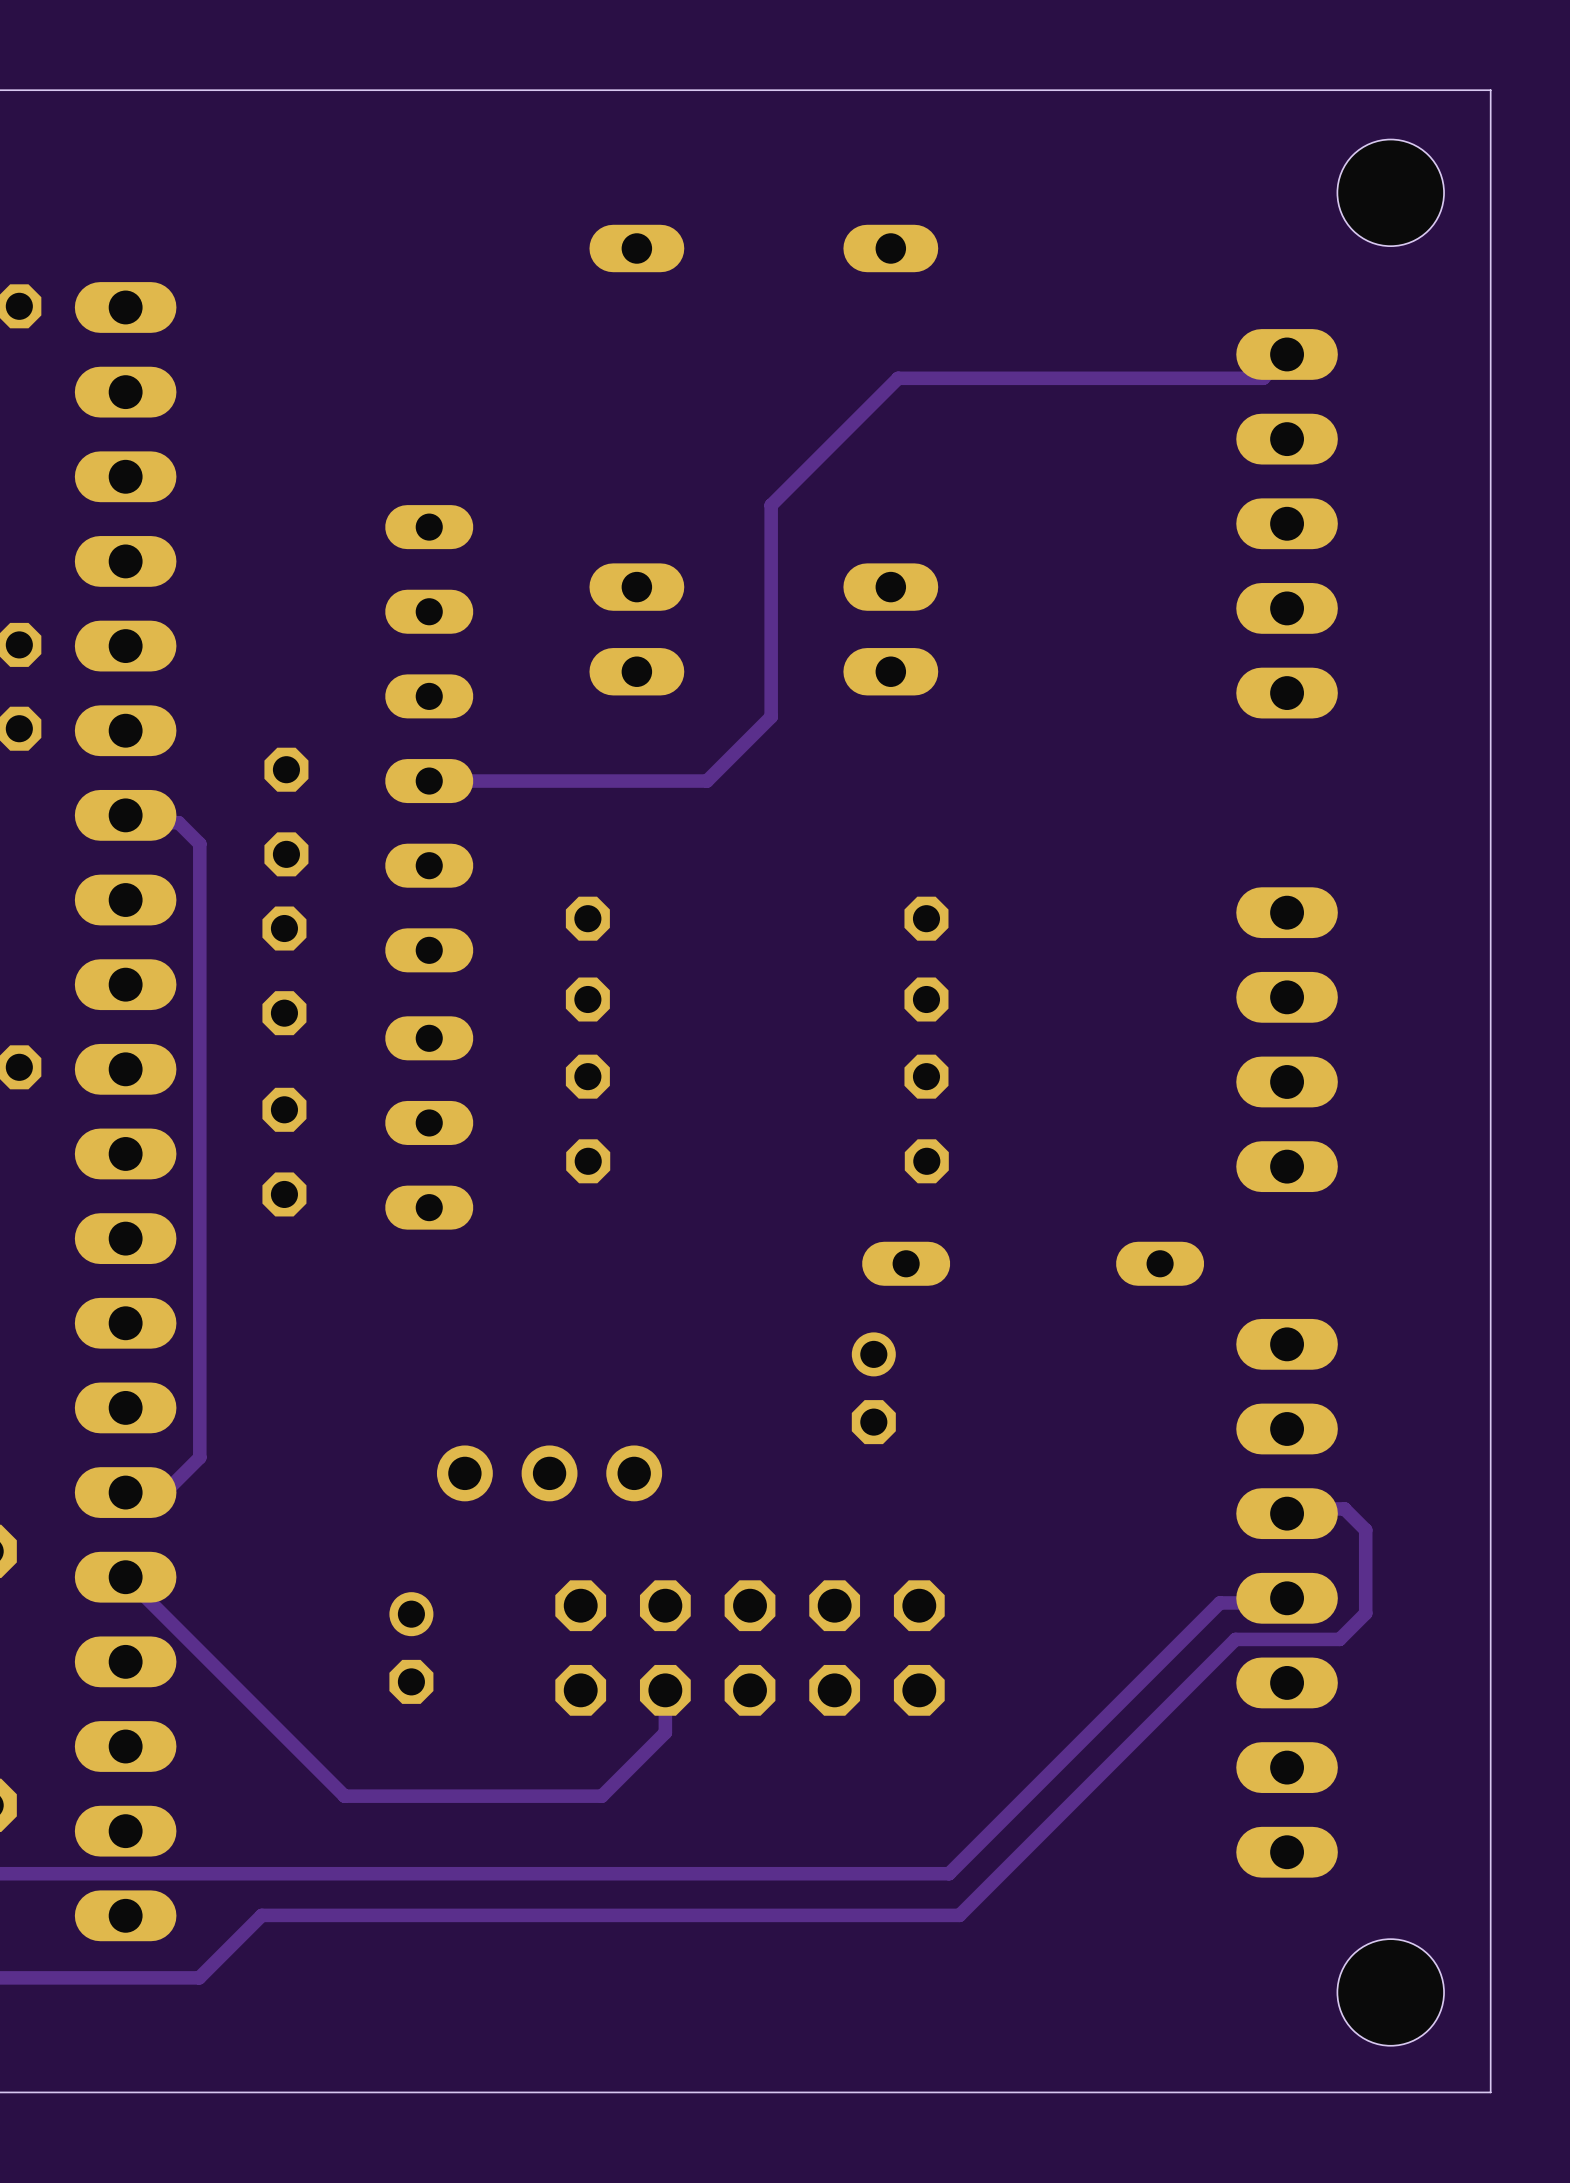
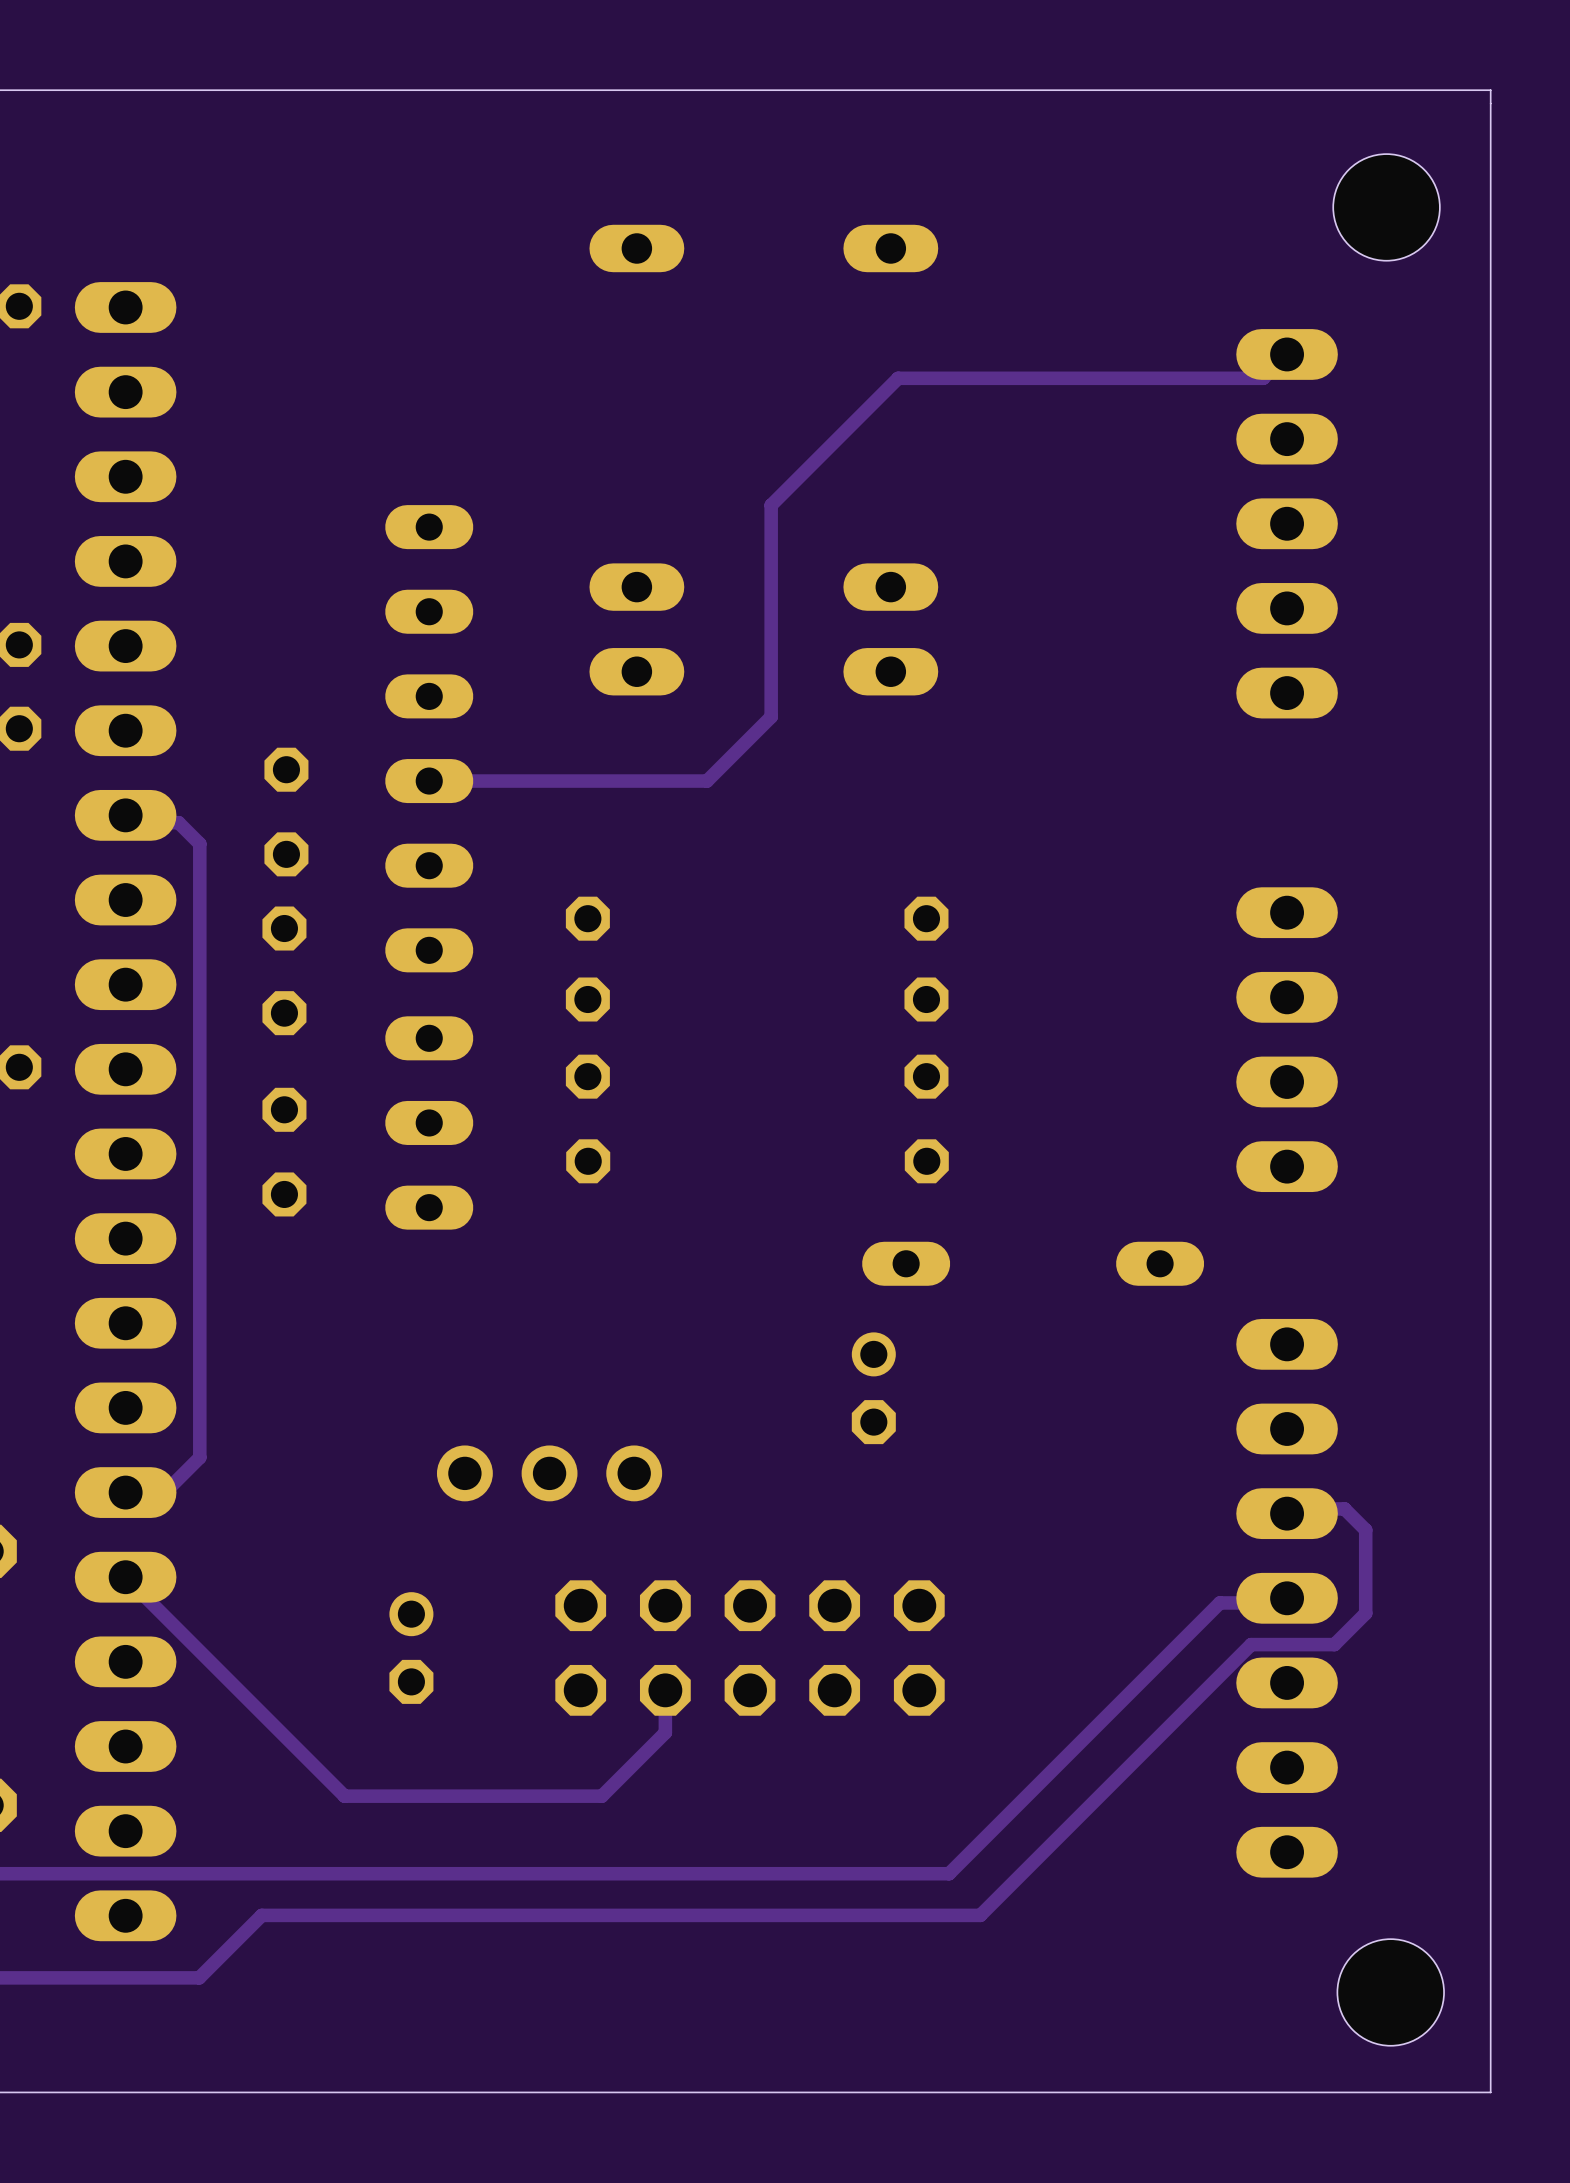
hole position: (1390, 192) -> (1386, 207)
track: (1339, 1639) (1235, 1639) (959, 1915) -> (1339, 1639) (1334, 1644) (1251, 1644) (980, 1915) (959, 1915)

